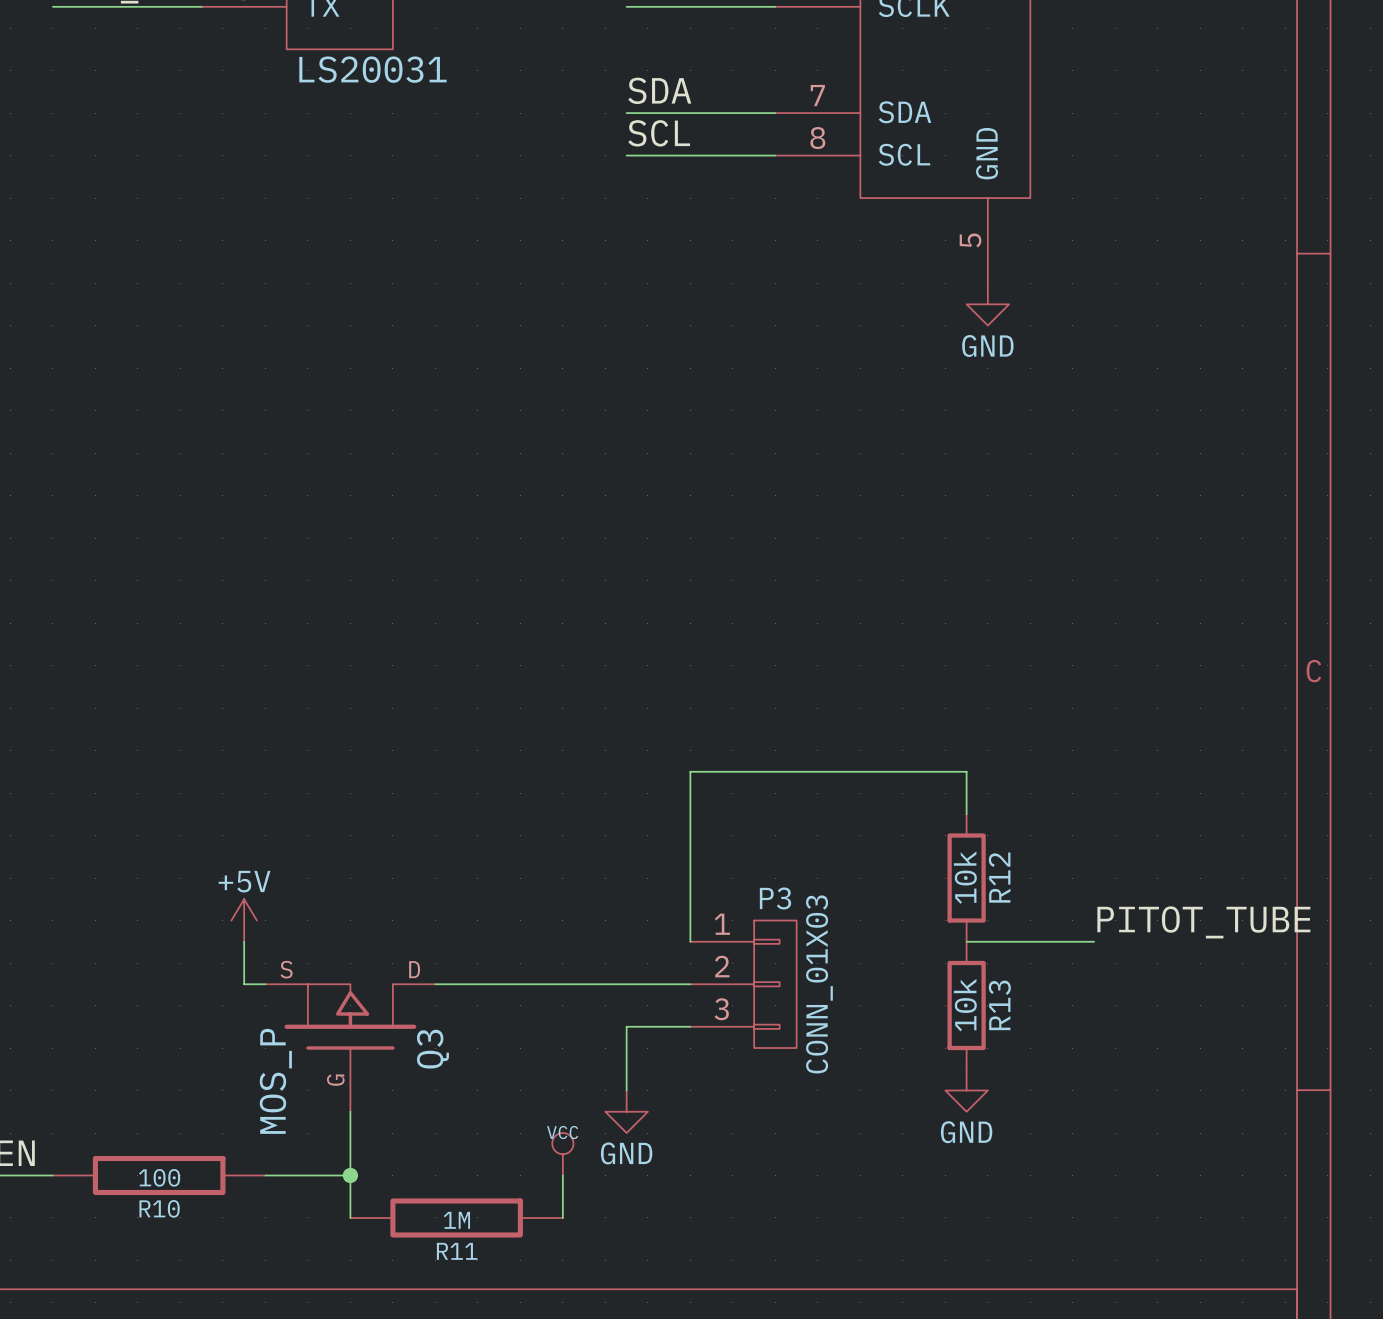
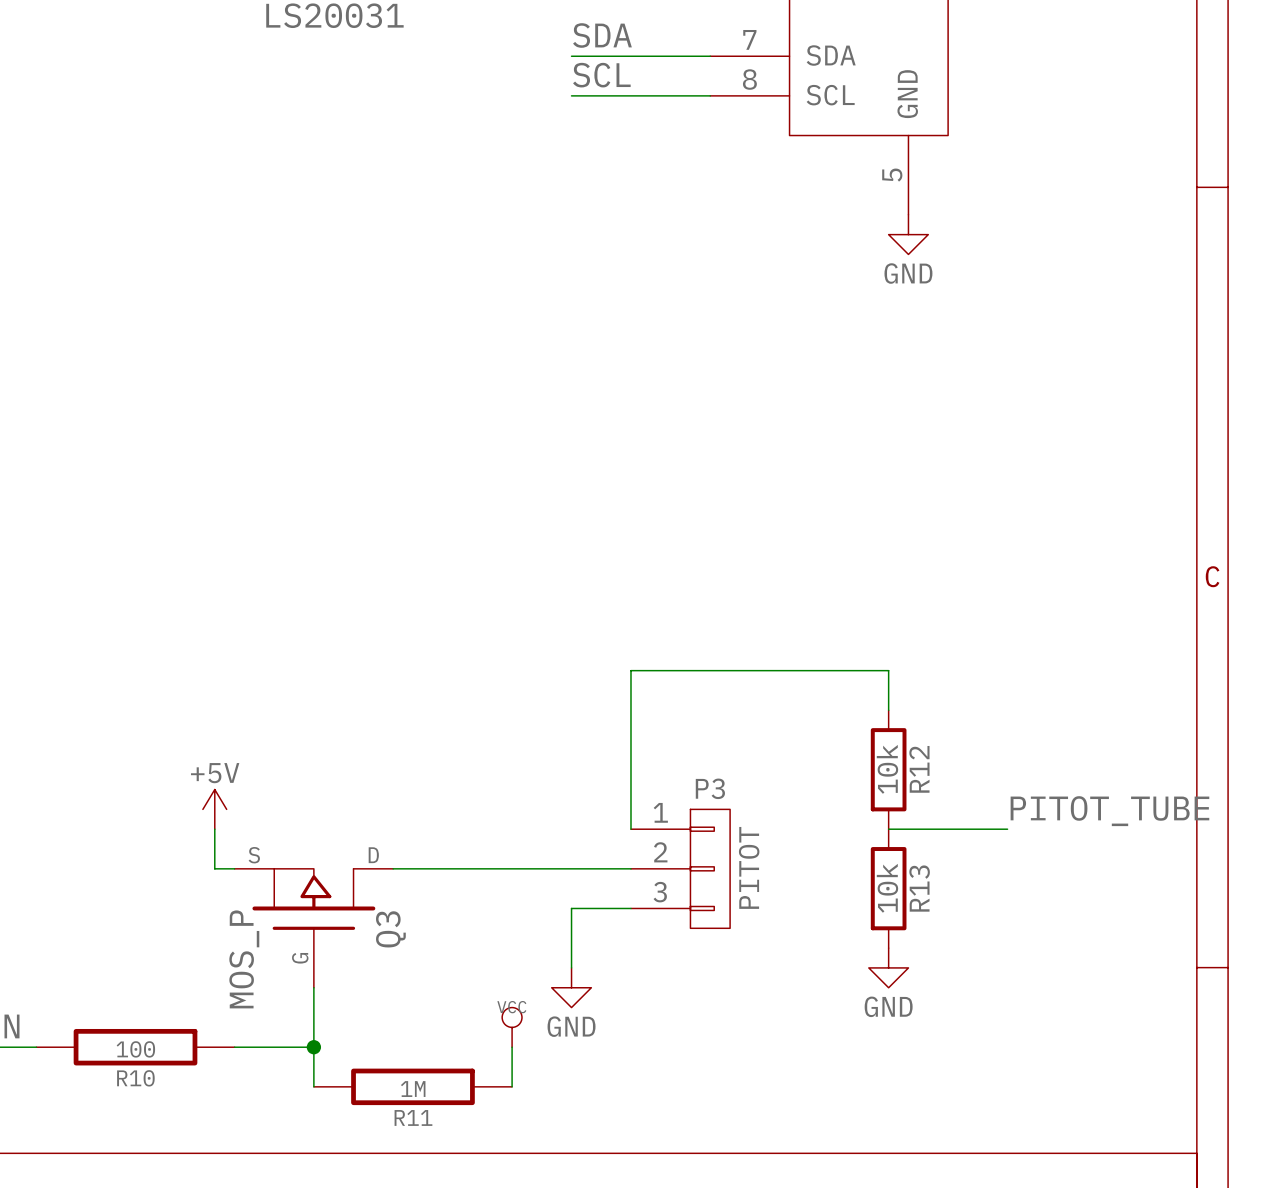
P3 value: CONN_01X03 (819, 984) -> PITOT (749, 867)

